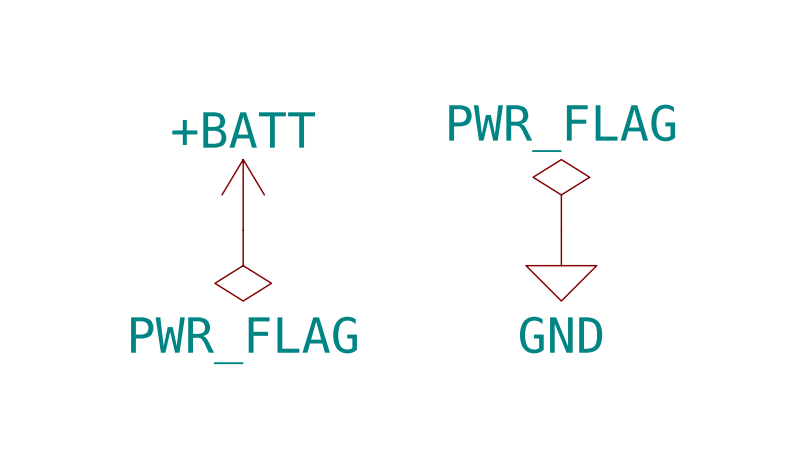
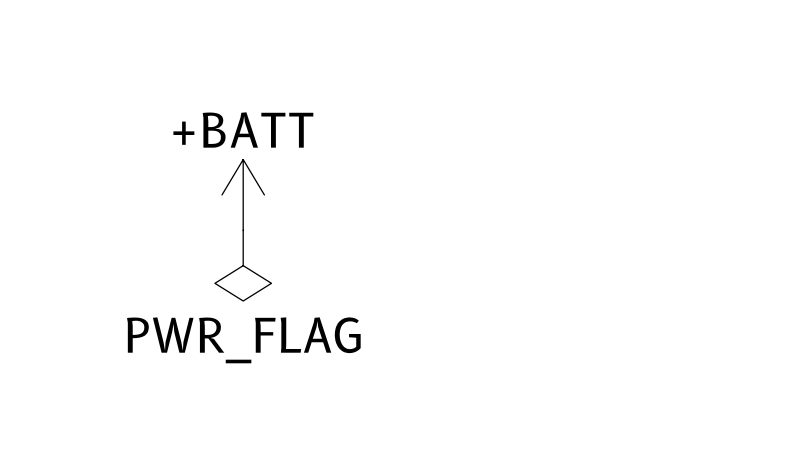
power symbol: PWR_FLAG (561, 194) -> none
power symbol: GND (561, 265) -> none

